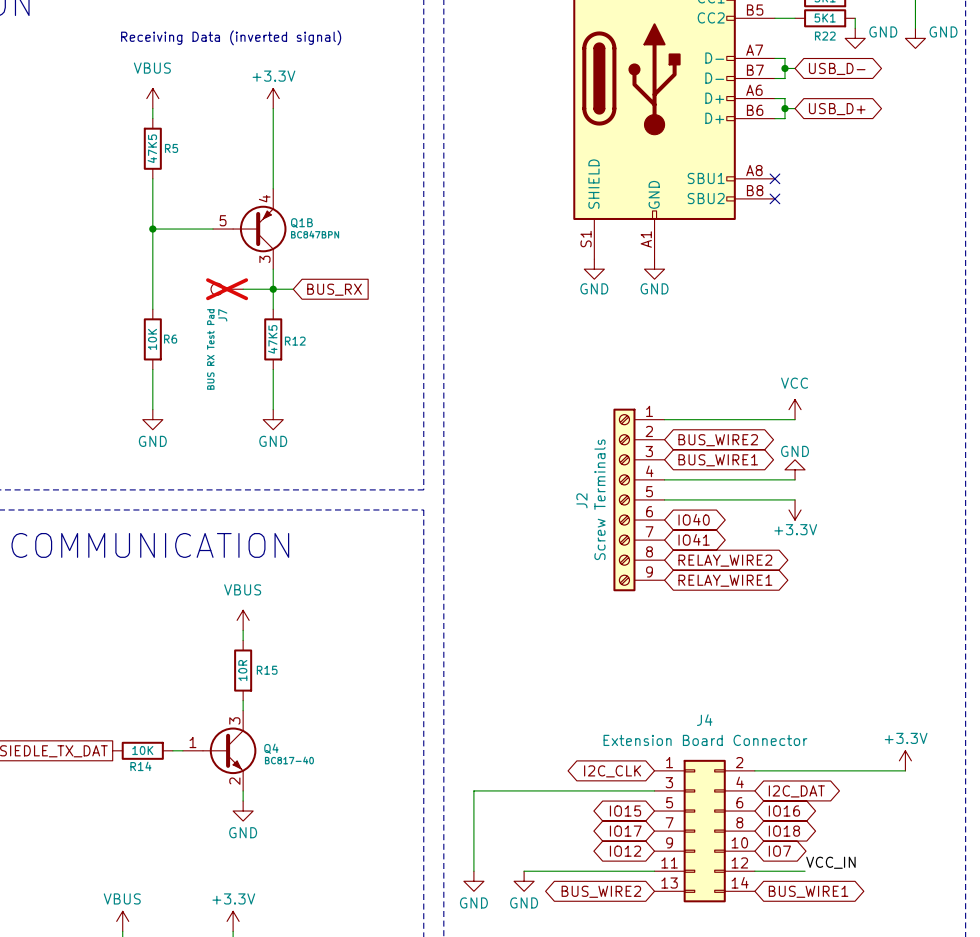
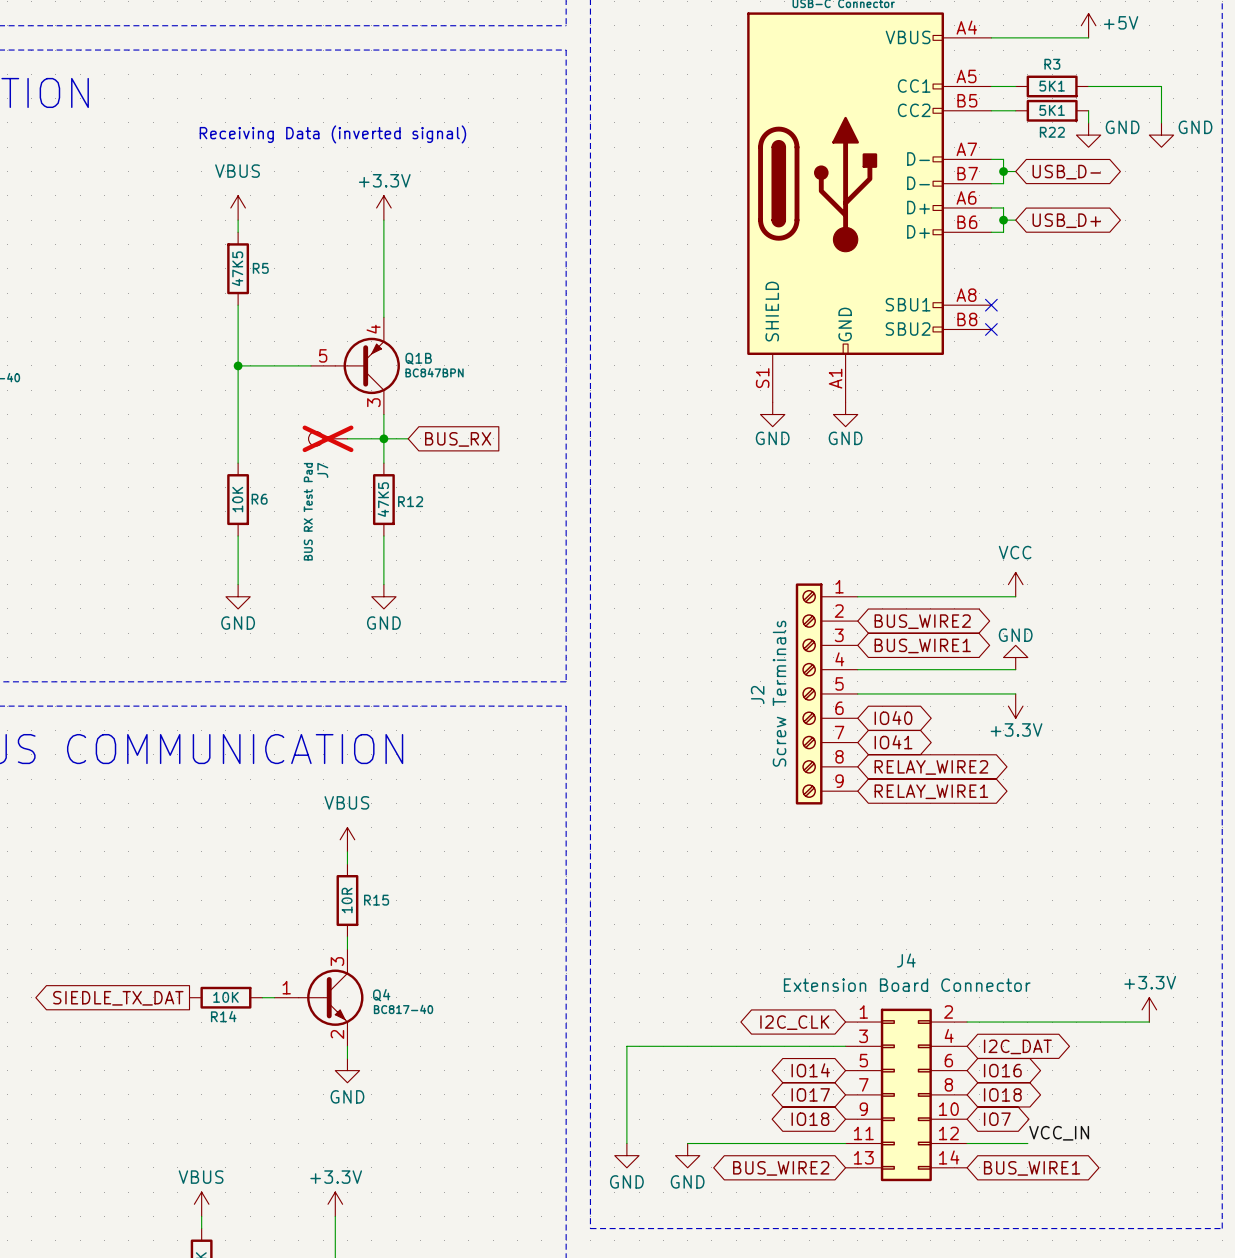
global label: IO15 (625, 811) -> IO14 (810, 1070)
global label: IO12 (625, 851) -> IO18 (810, 1119)

